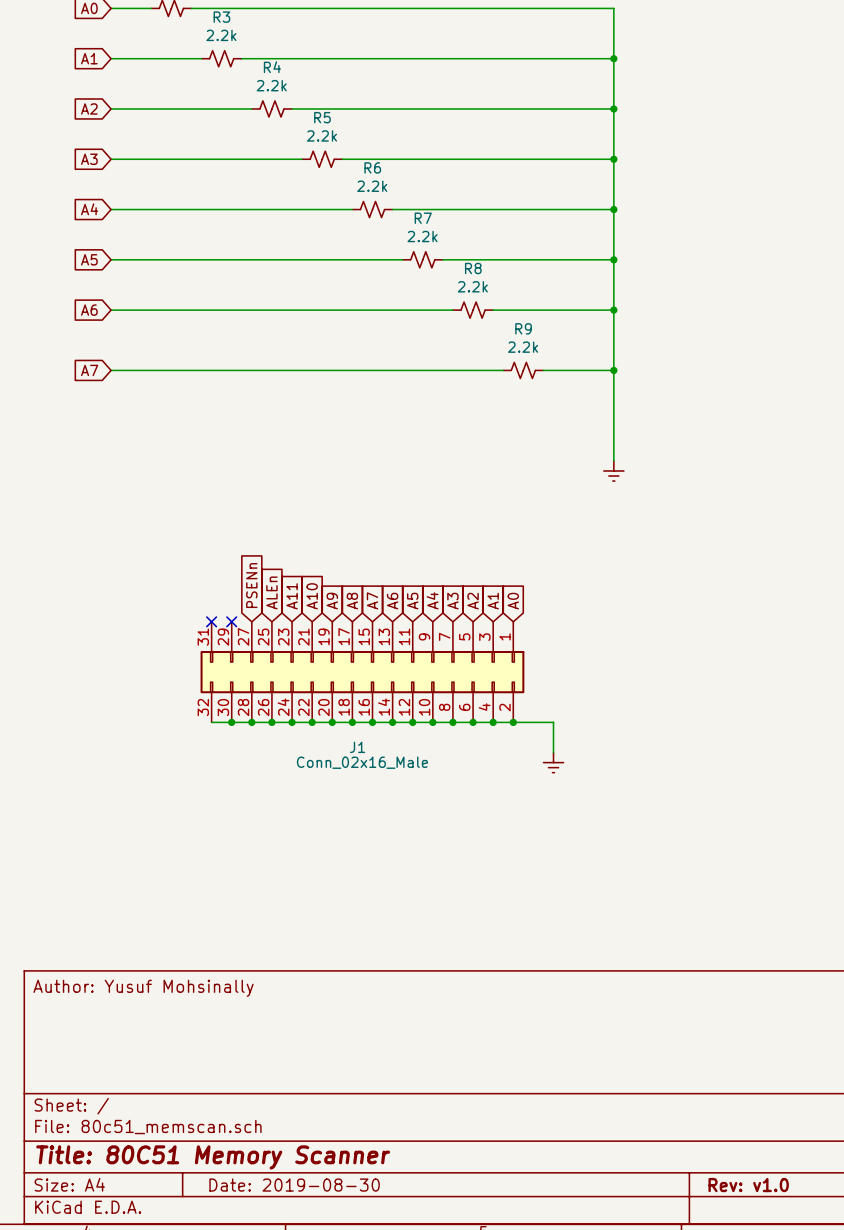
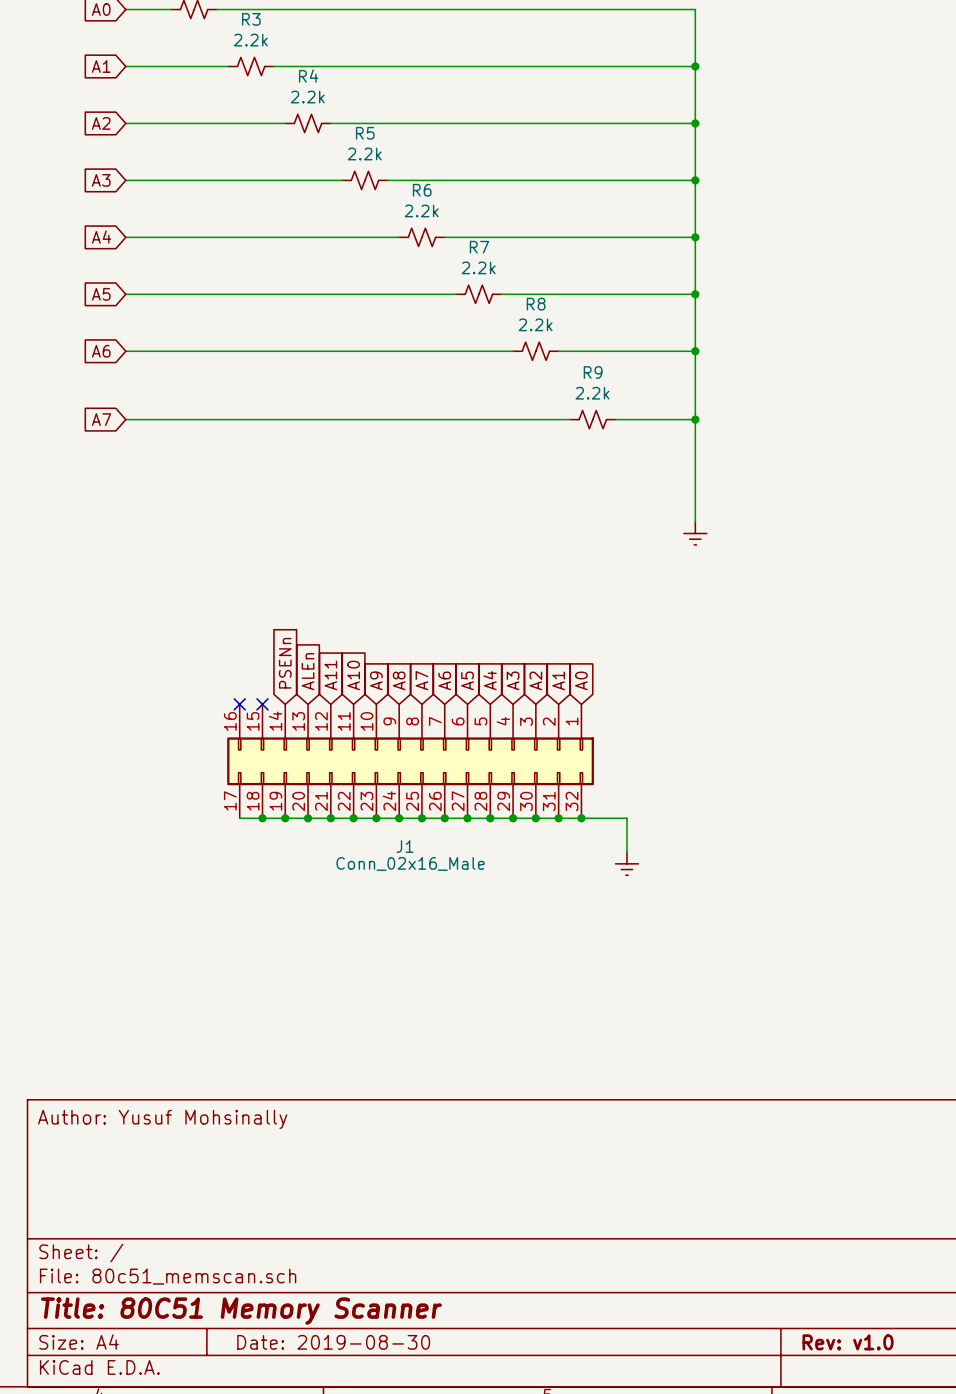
J1 symbol: [200, 621, 525, 723] -> [227, 704, 594, 819]

